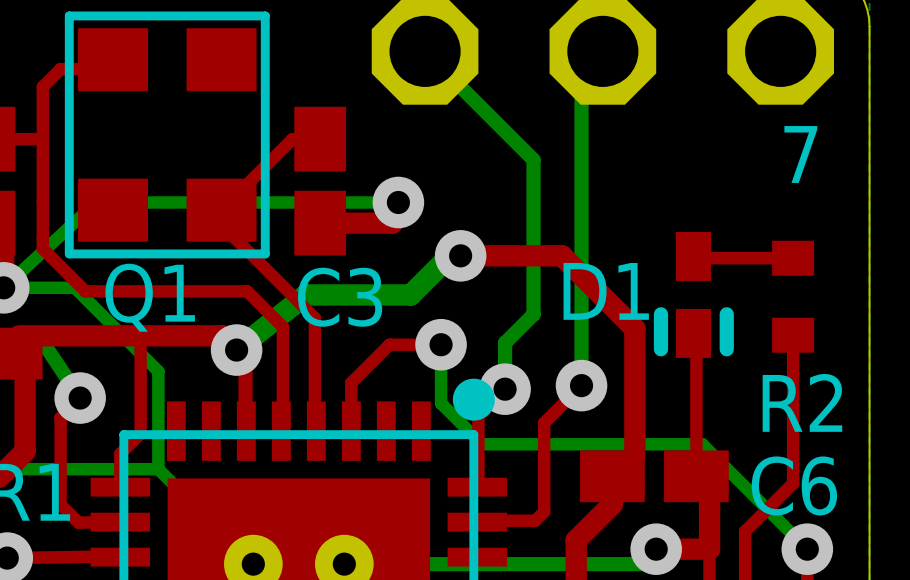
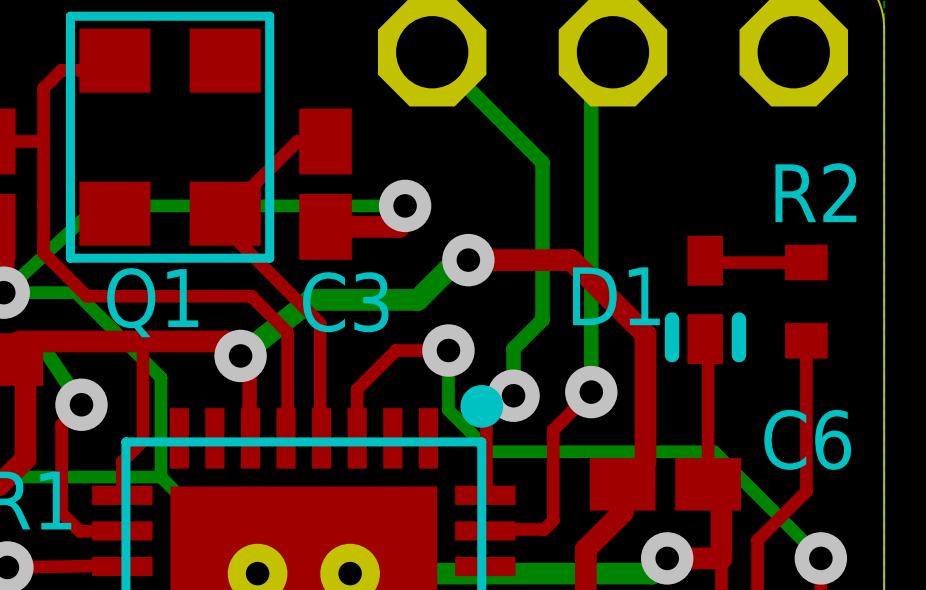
text: 7 (800, 154) -> none
R2 name position: R2 (802, 402) -> R2 (815, 192)
C6 name position: C6 (794, 485) -> C6 (807, 439)
bottom track width: thin (656, 549) (641, 564) (344, 564) -> thick (667, 558) (652, 573) (350, 573)

